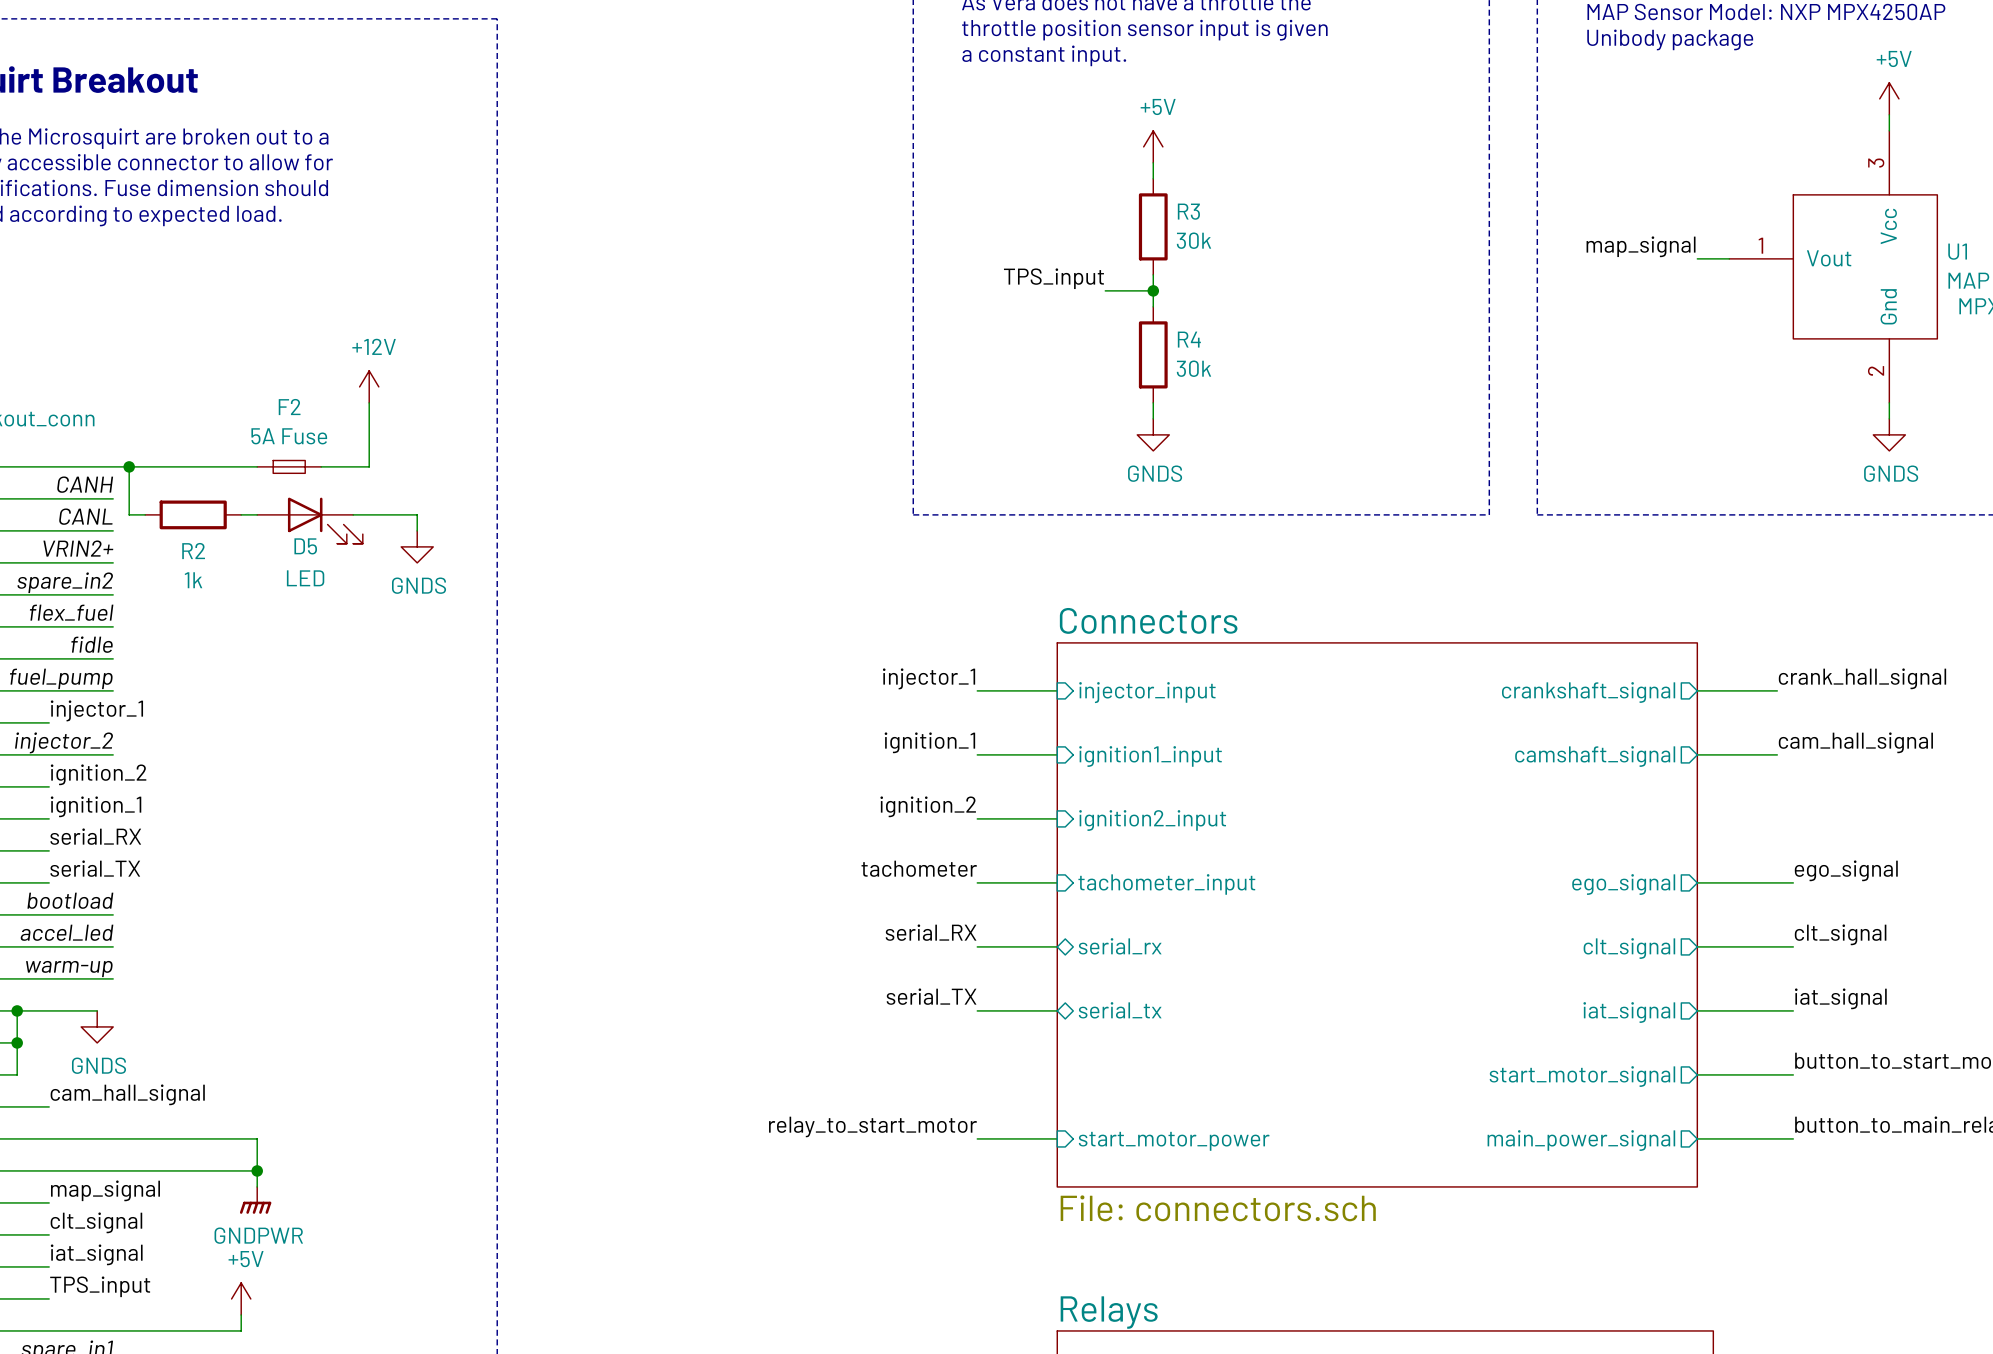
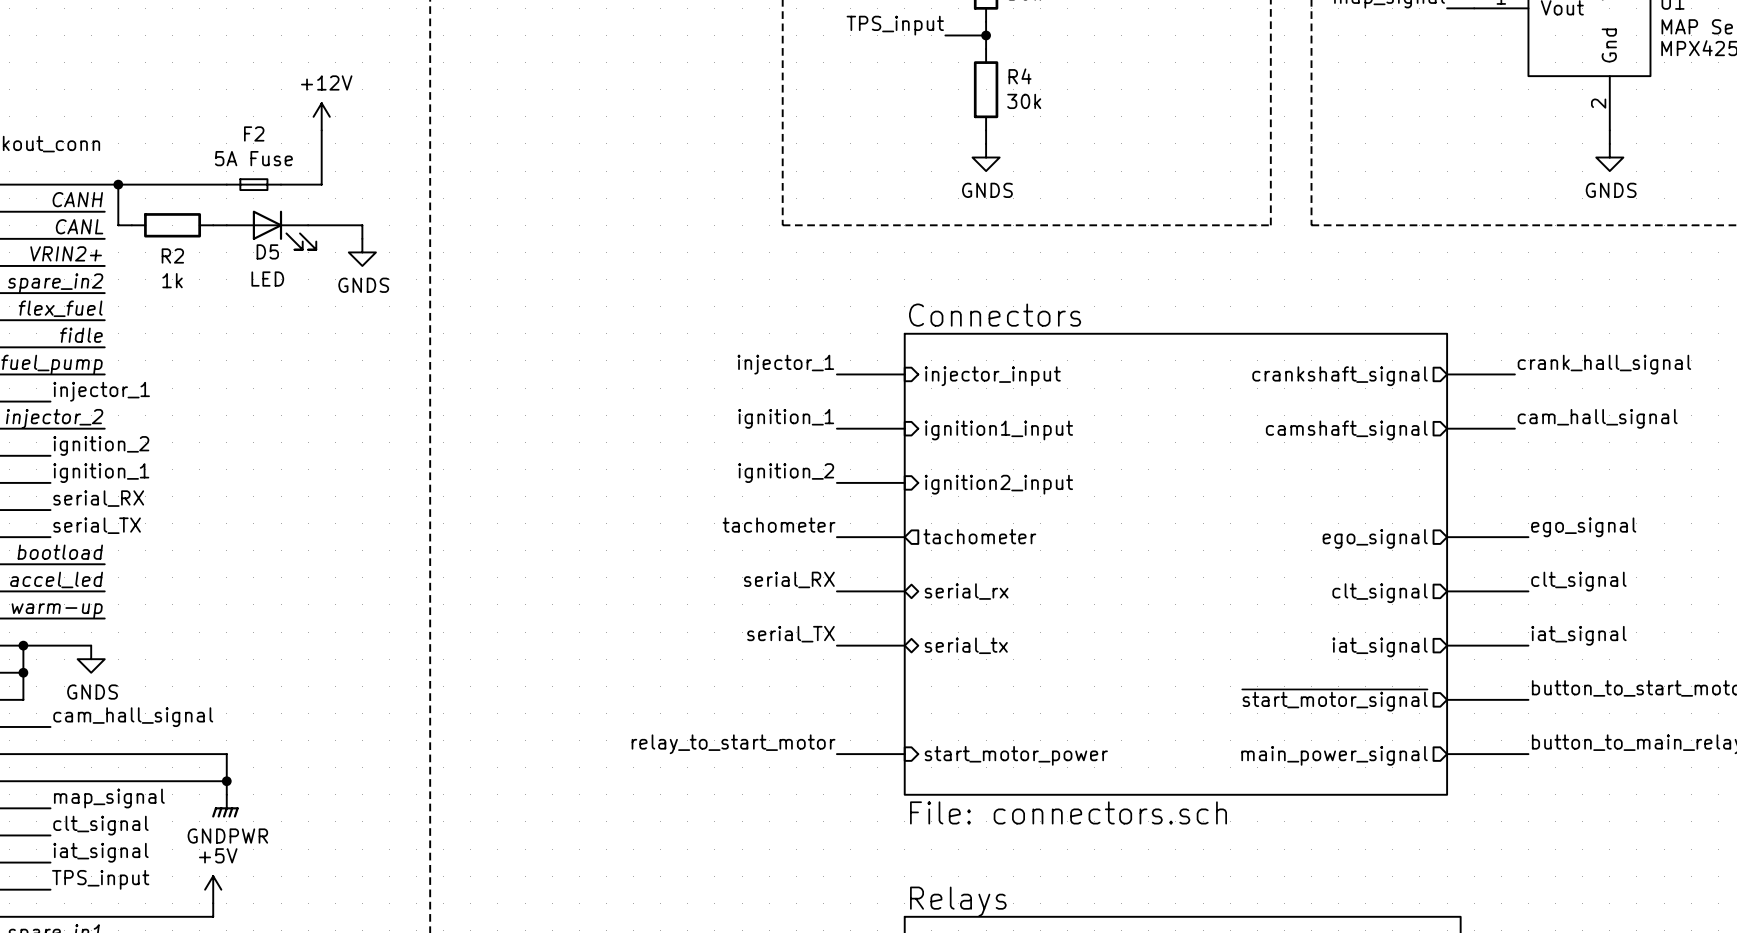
sheet pin shape: input (1166, 884) -> output (979, 536)
sheet pin: tachometer_input (1166, 884) -> tachometer (979, 536)
sheet pin: start_motor_signal (1582, 1076) -> ~{start_motor_signal} (1334, 700)

